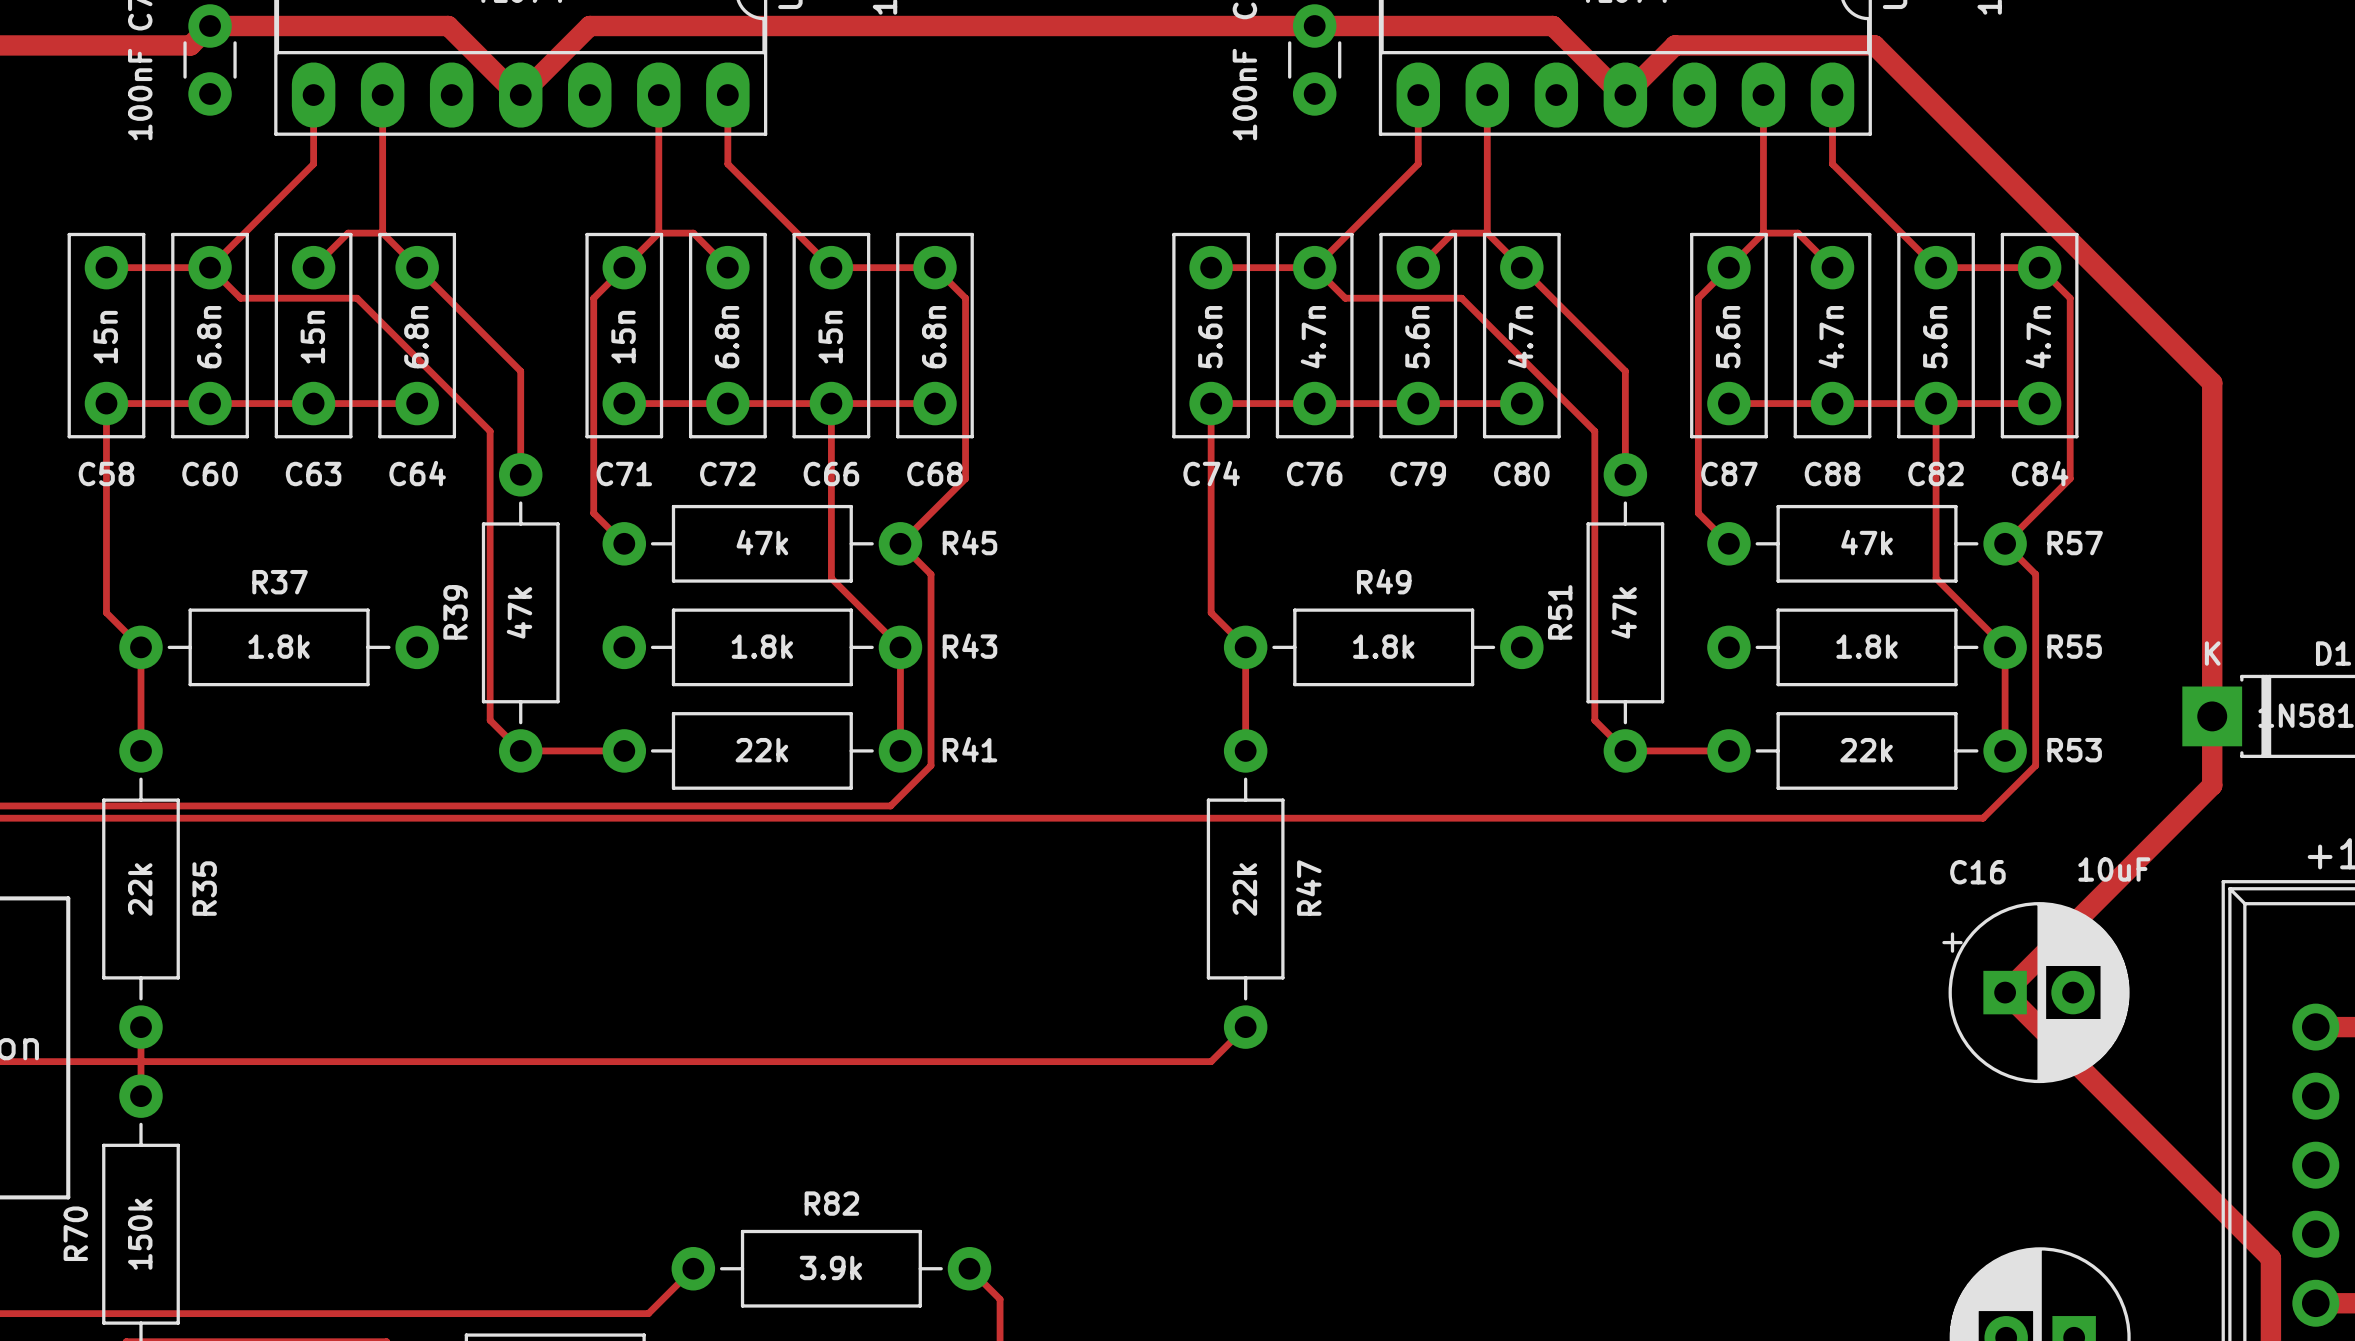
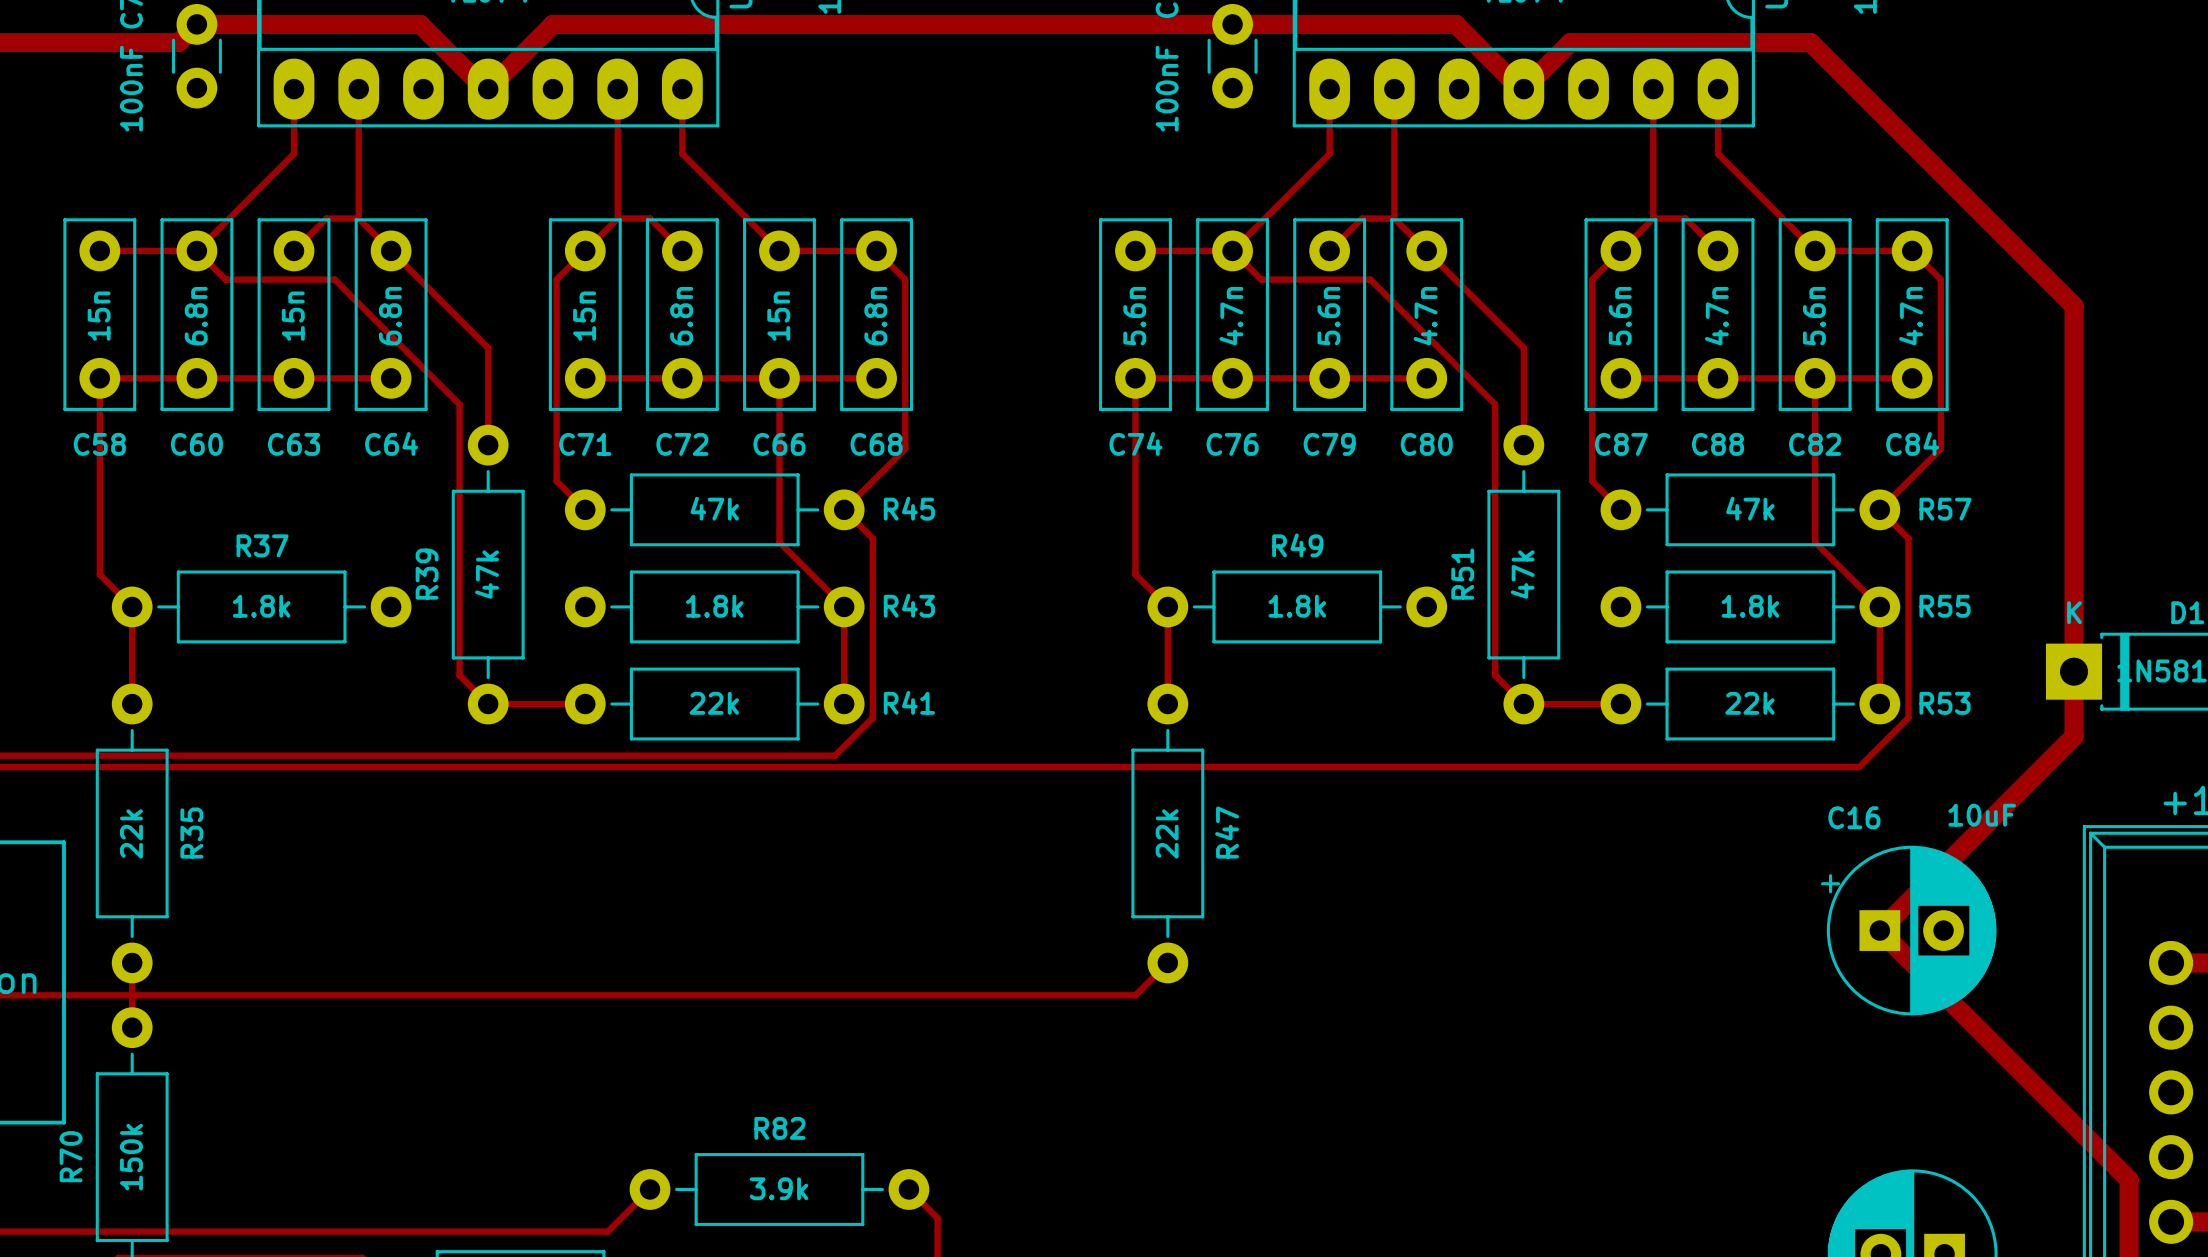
track: (1874, 45) (2212, 382) -> (1757, 42) (1810, 42) (2074, 305) (2074, 359)

